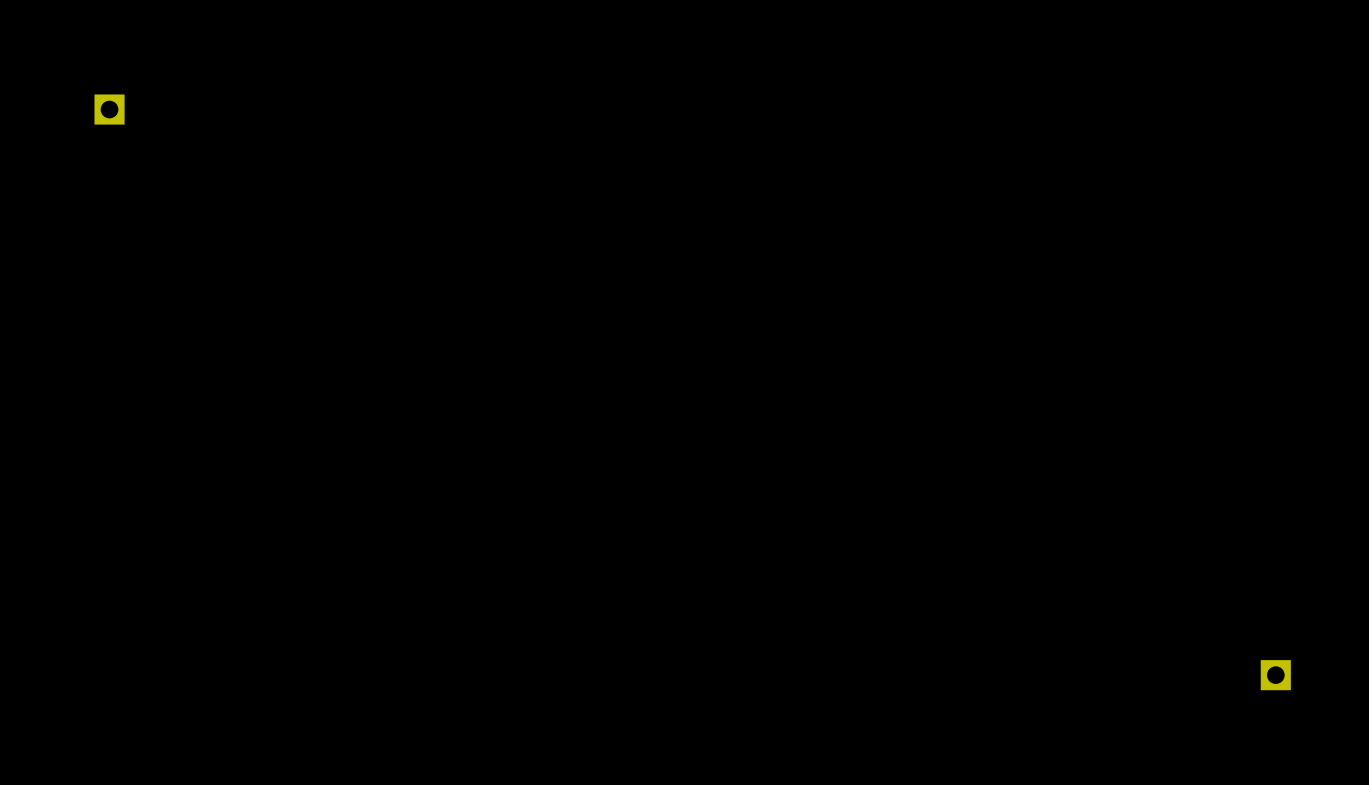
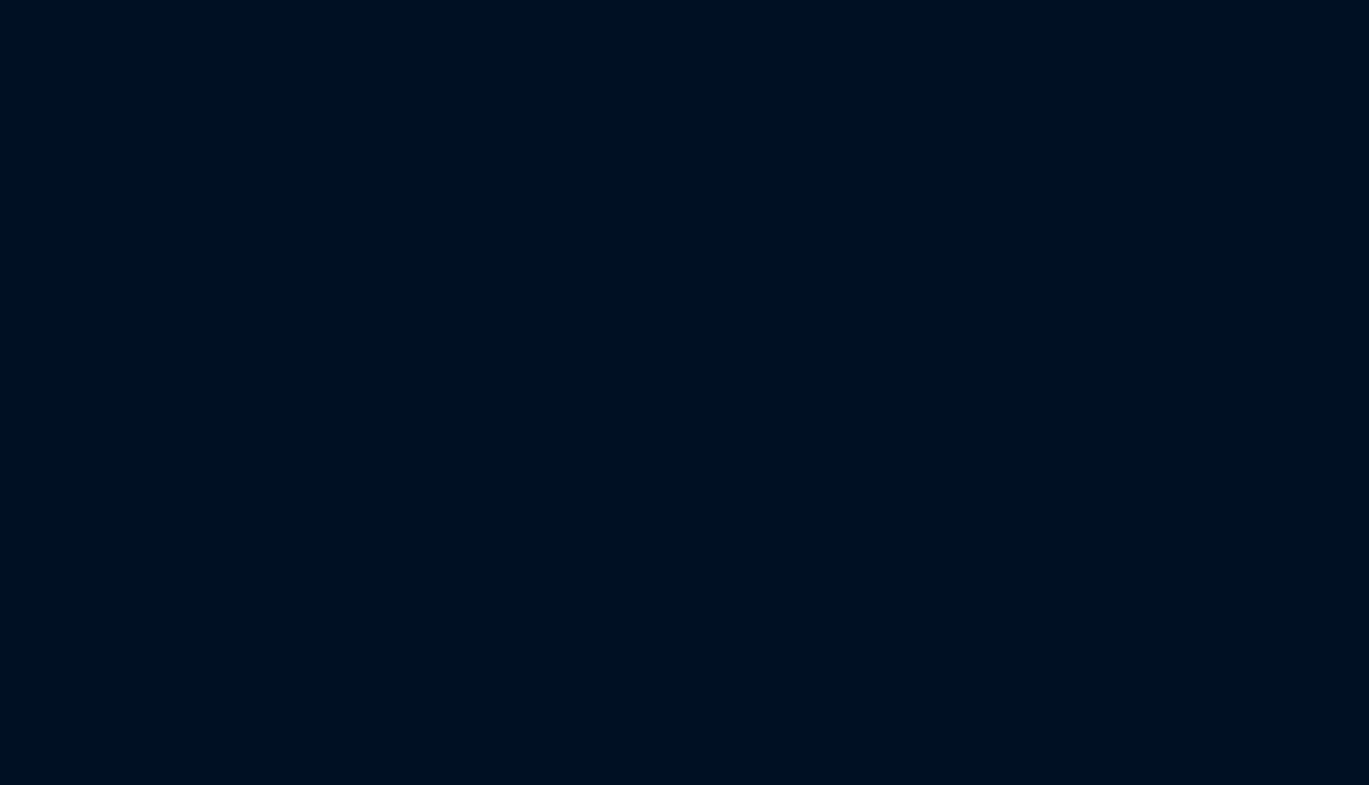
part: (109, 109) -> none
part: (1275, 675) -> none

